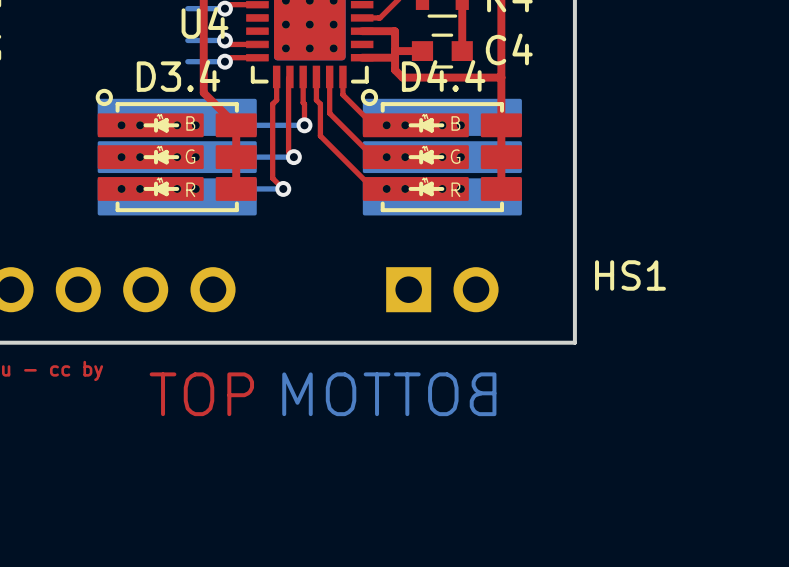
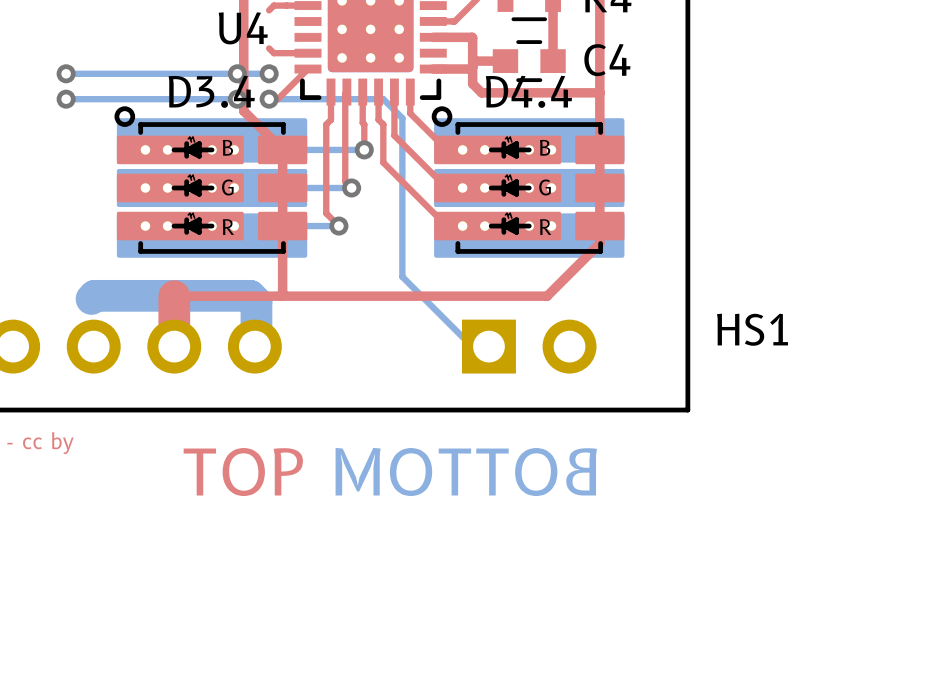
bottom track: (187, 8) (224, 8) -> none
via: (224, 8) -> none
bottom track: (187, 40) (224, 40) -> none
via: (224, 40) -> none
top track: (228, 57) (257, 57) -> (269, 99) (277, 99) (308, 69)
bottom track: none -> (66, 73) (224, 73)
via: none -> (66, 73)
via: none -> (237, 73)
bottom track: none -> (66, 99) (237, 99)
via: none -> (66, 99)
via: none -> (237, 99)
bottom track: none -> (269, 99) (383, 99) (402, 118) (402, 276) (472, 346) (488, 346)
via: none -> (269, 99)
top track: none -> (282, 226) (281, 296)
top track: none -> (599, 226) (599, 243) (547, 296) (174, 296) (174, 346)
bottom track: none -> (91, 299) (94, 295) (250, 295) (256, 302) (256, 345) (254, 346)

